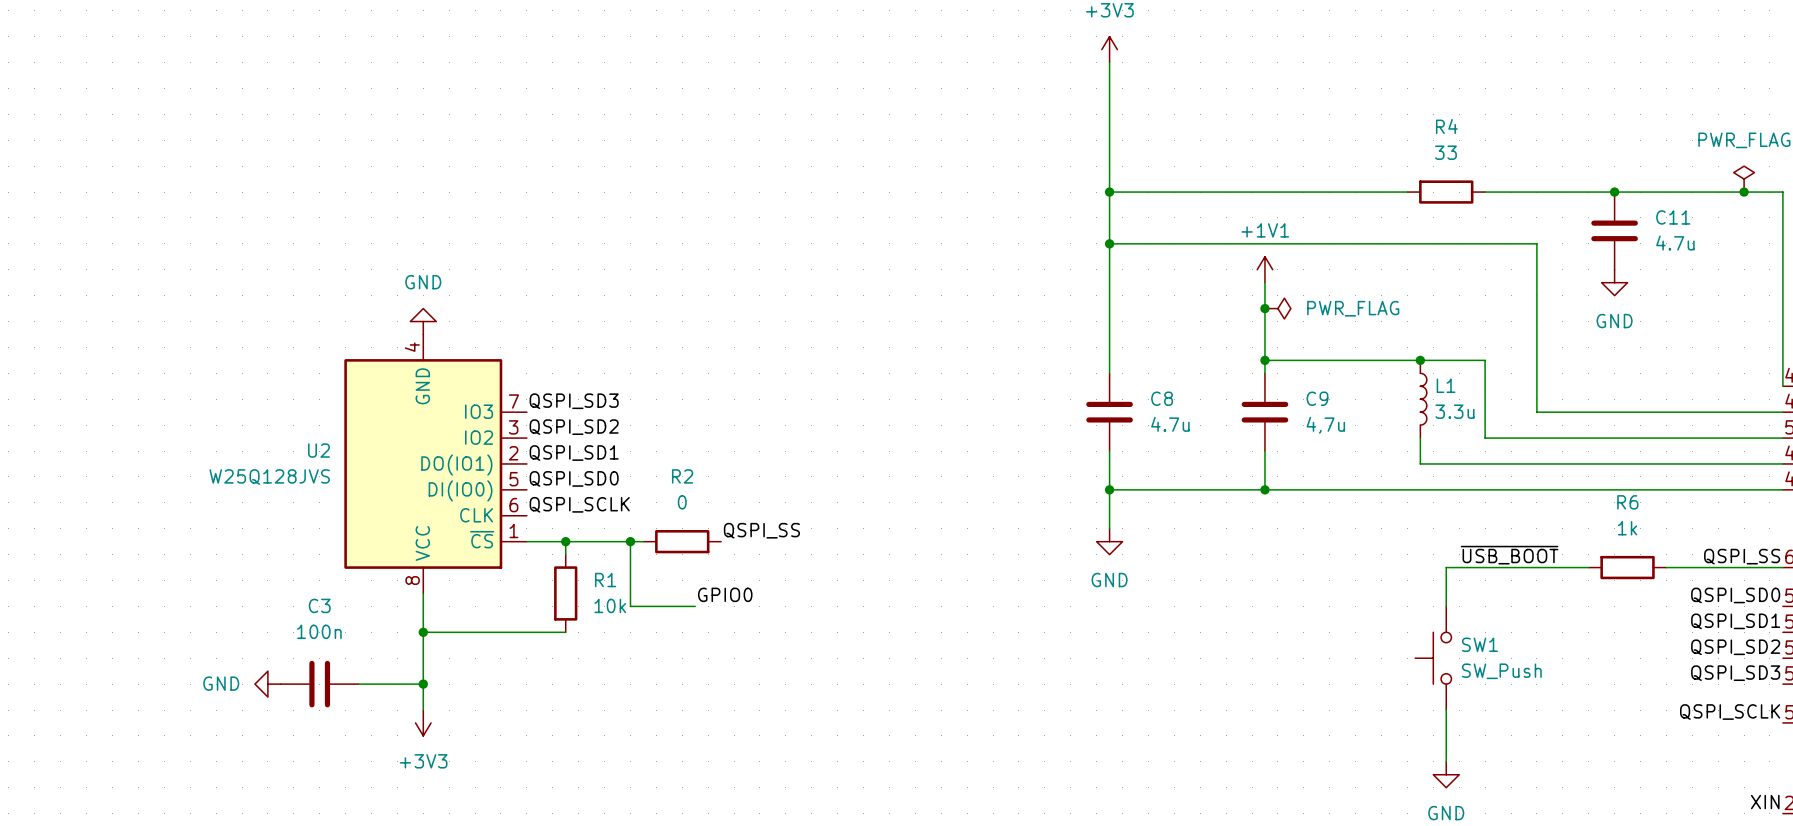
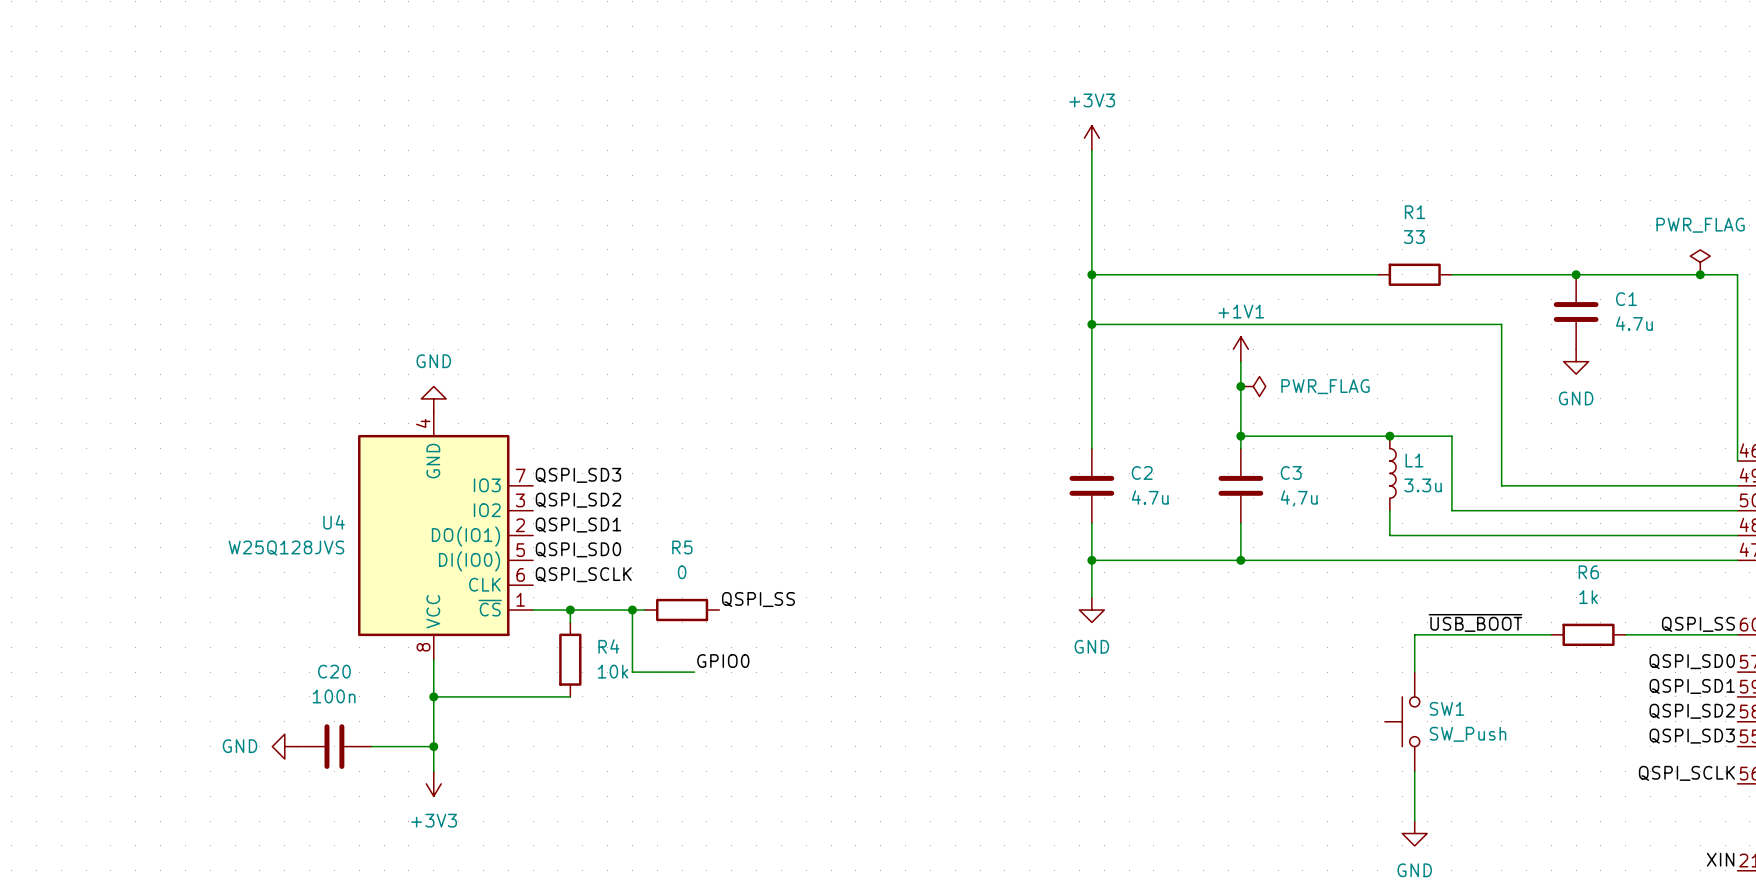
R4 name: R4 (1446, 126) -> R1 (1415, 212)
C11 name: C11 (1673, 217) -> C1 (1626, 299)
C8 name: C8 (1162, 398) -> C2 (1142, 472)
C9 name: C9 (1317, 398) -> C3 (1291, 472)
U2 name: U2 (318, 450) -> U4 (334, 522)
R2 name: R2 (682, 476) -> R5 (682, 547)
R1 name: R1 (605, 580) -> R4 (608, 646)
C3 name: C3 (319, 605) -> C20 (334, 671)

